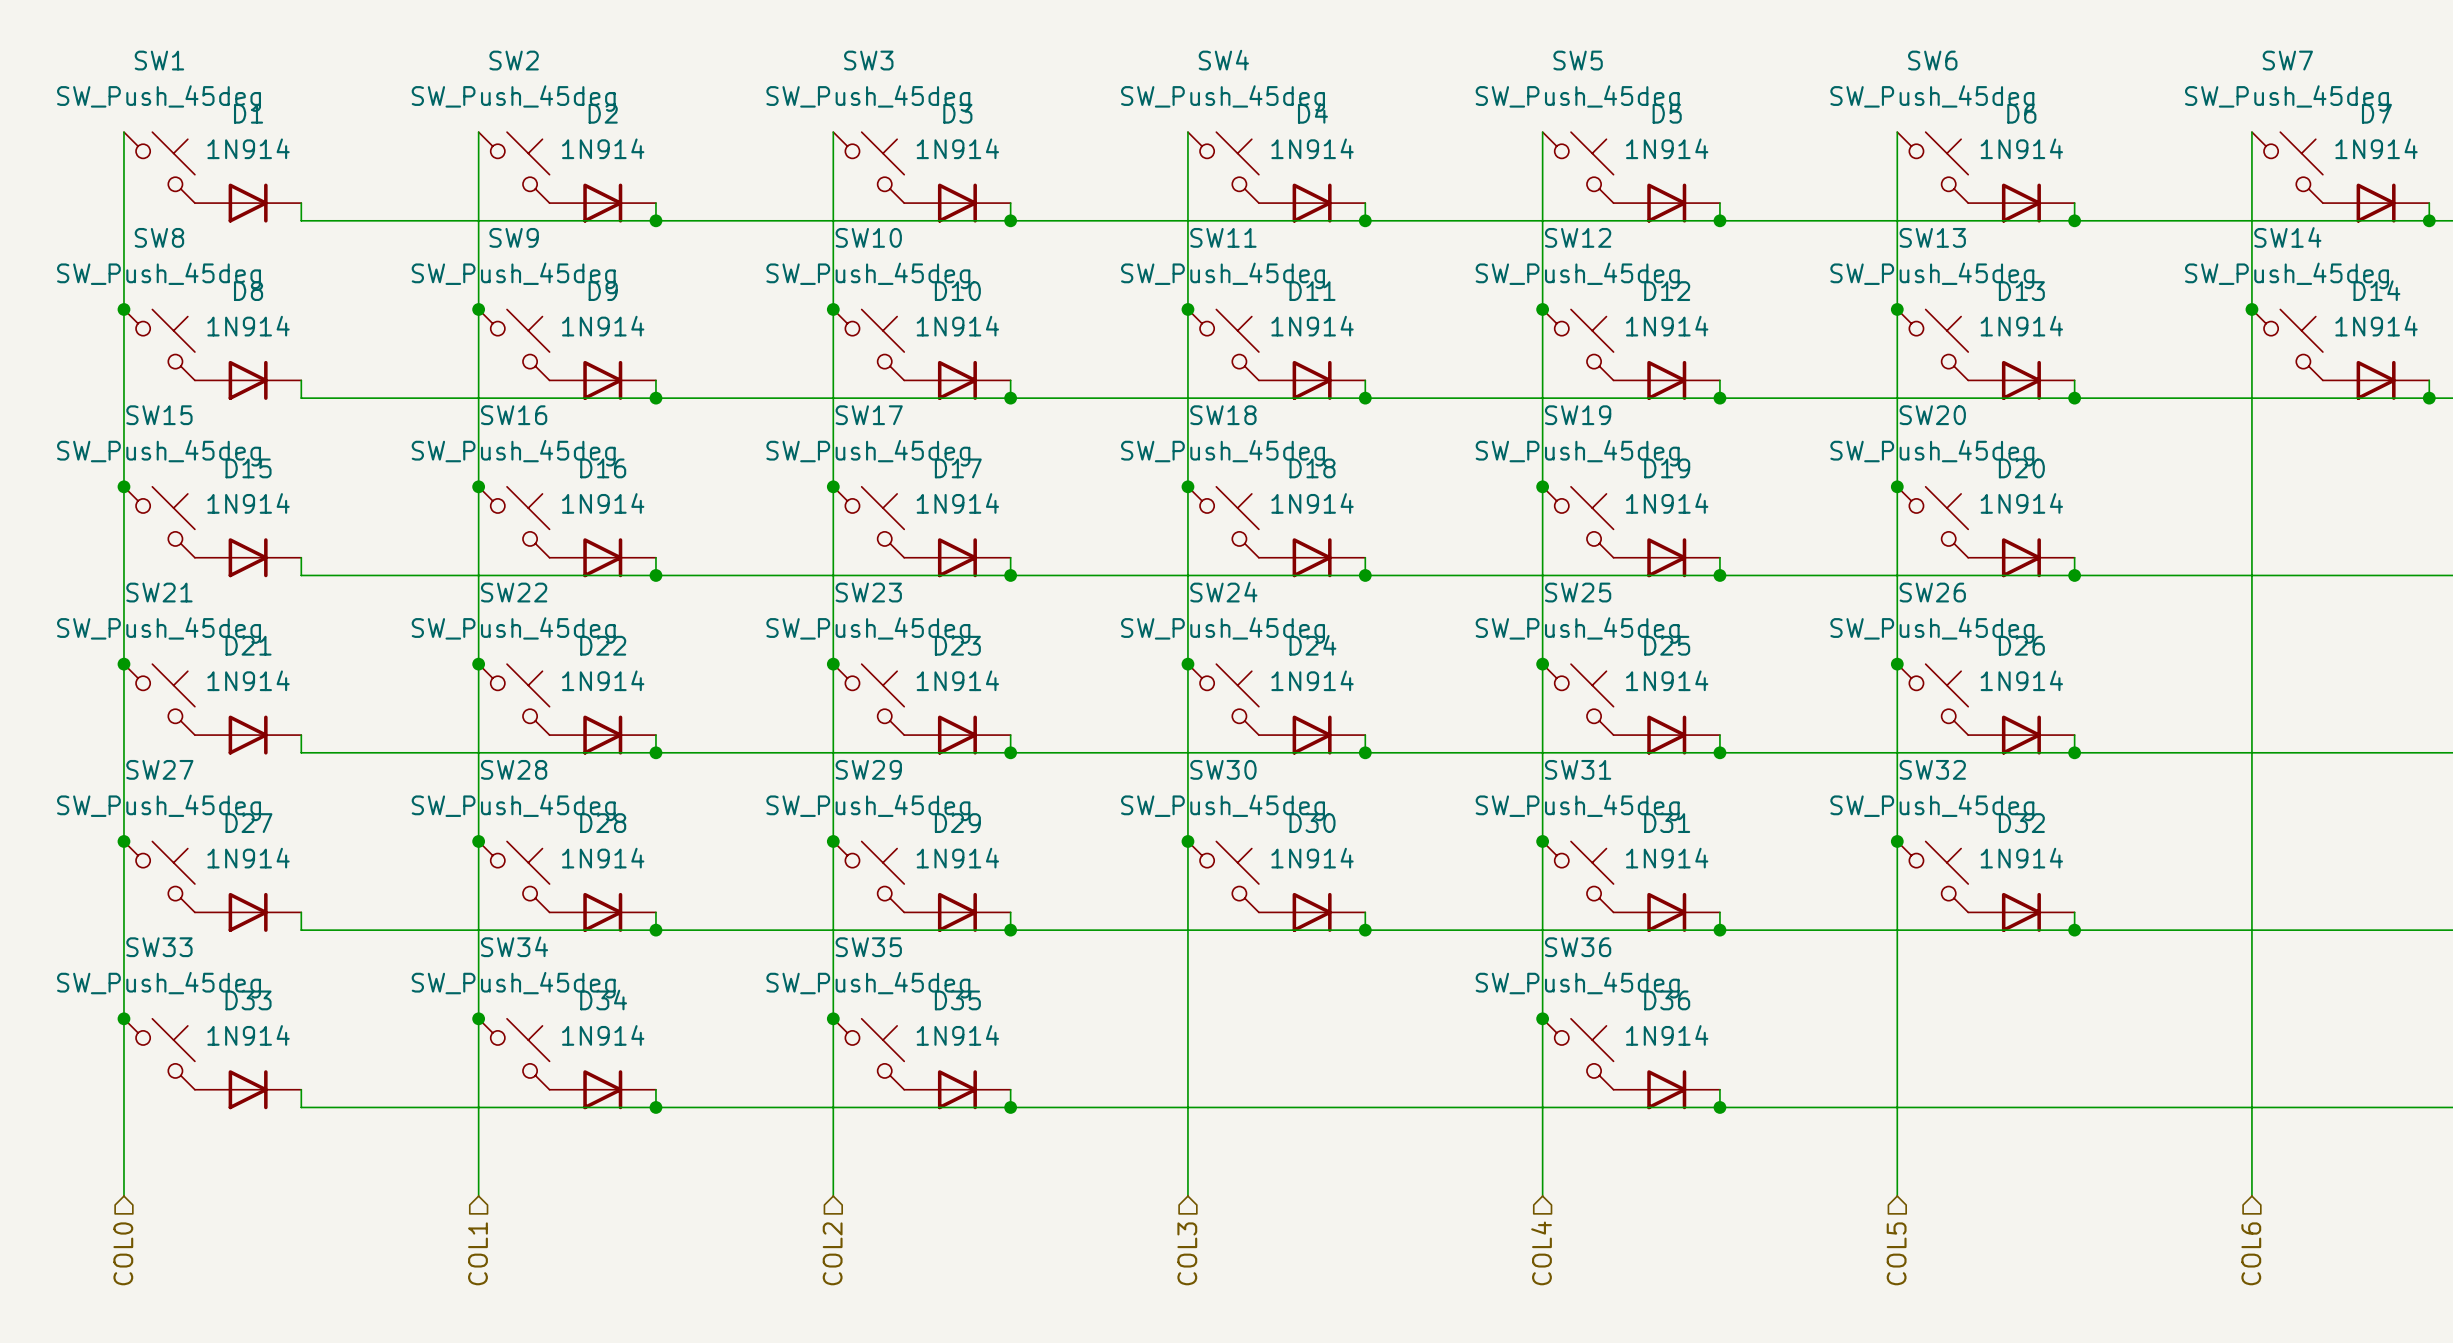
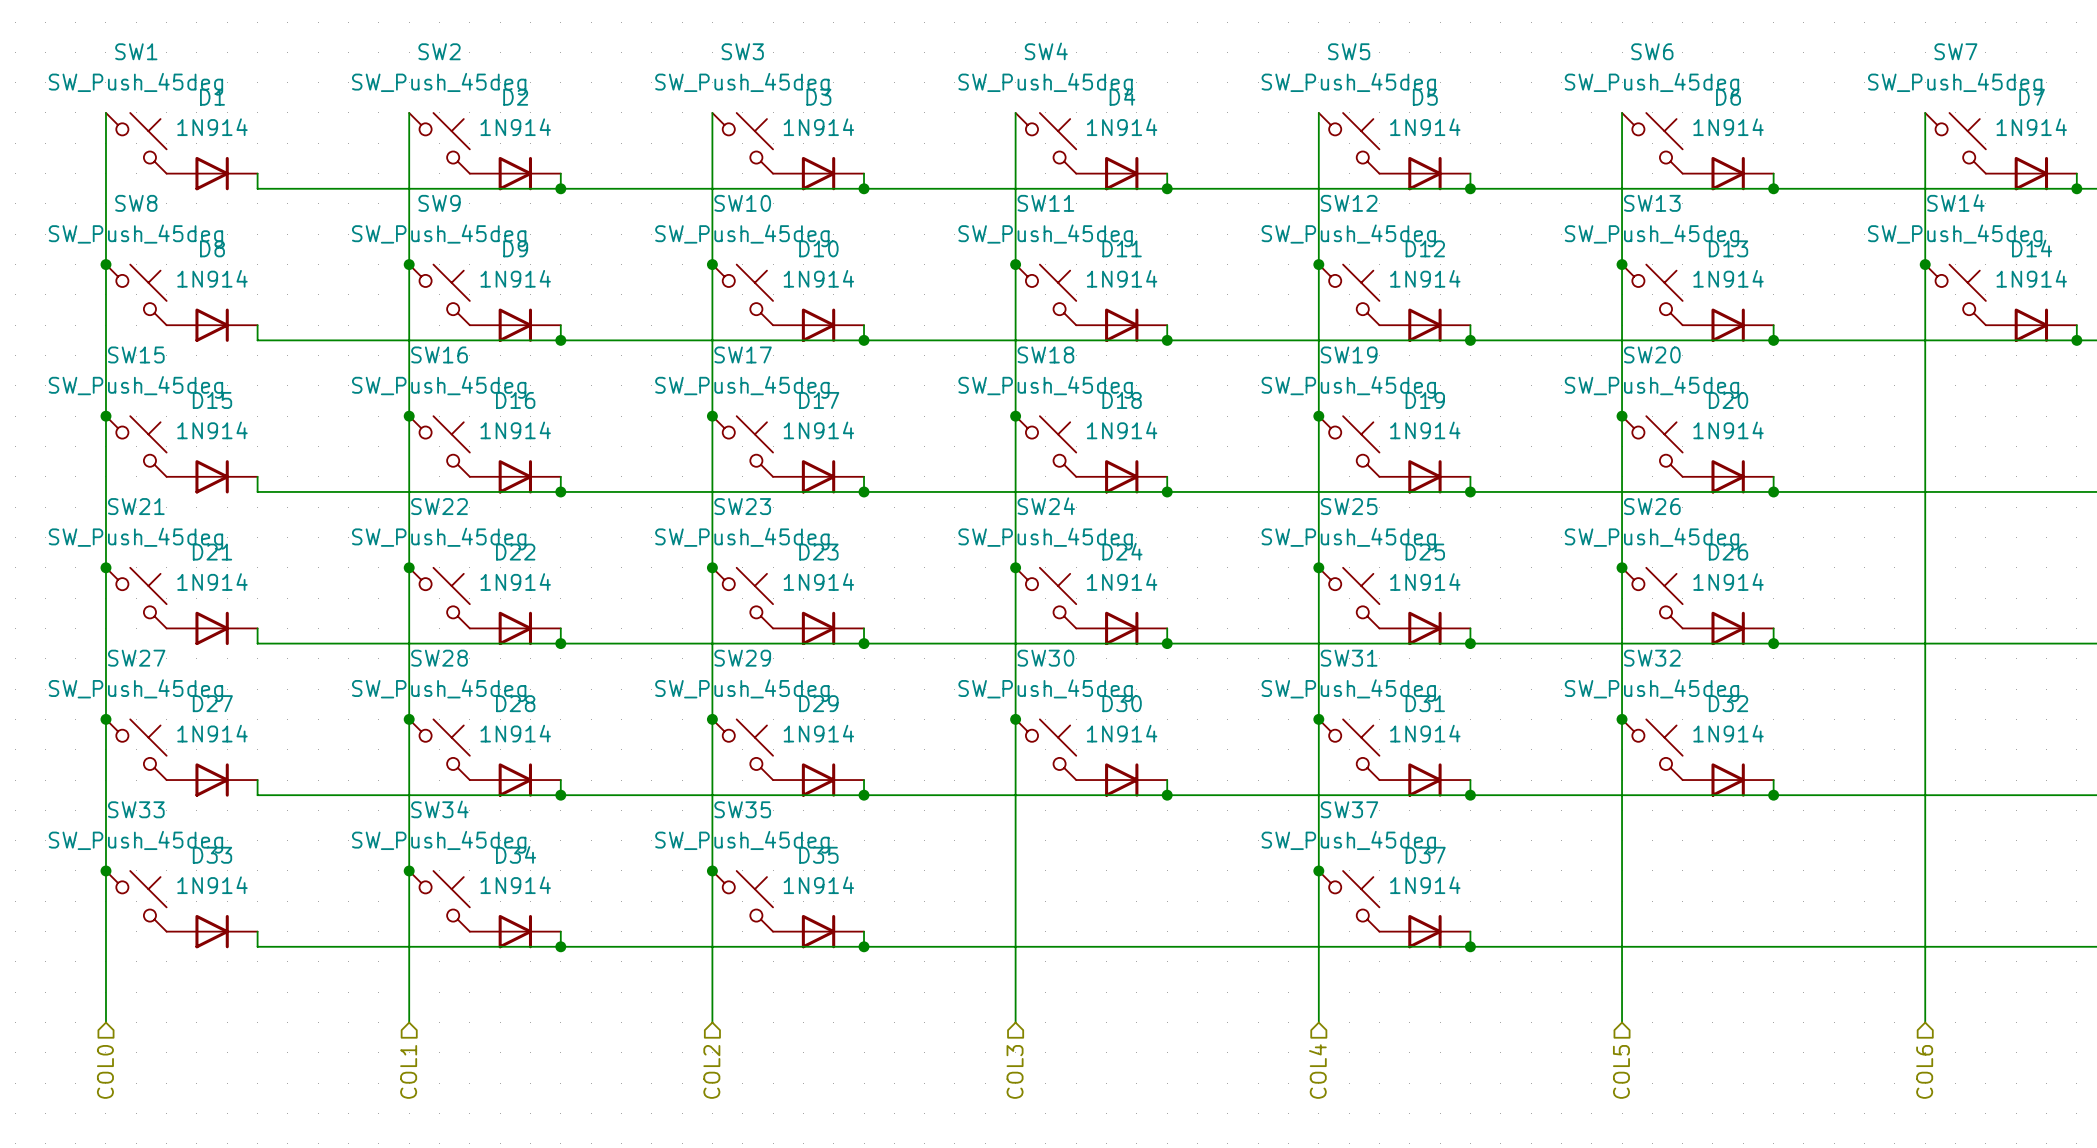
SW36 name: SW36 (1578, 947) -> SW37 (1349, 809)
D36 name: D36 (1667, 1000) -> D37 (1425, 855)

